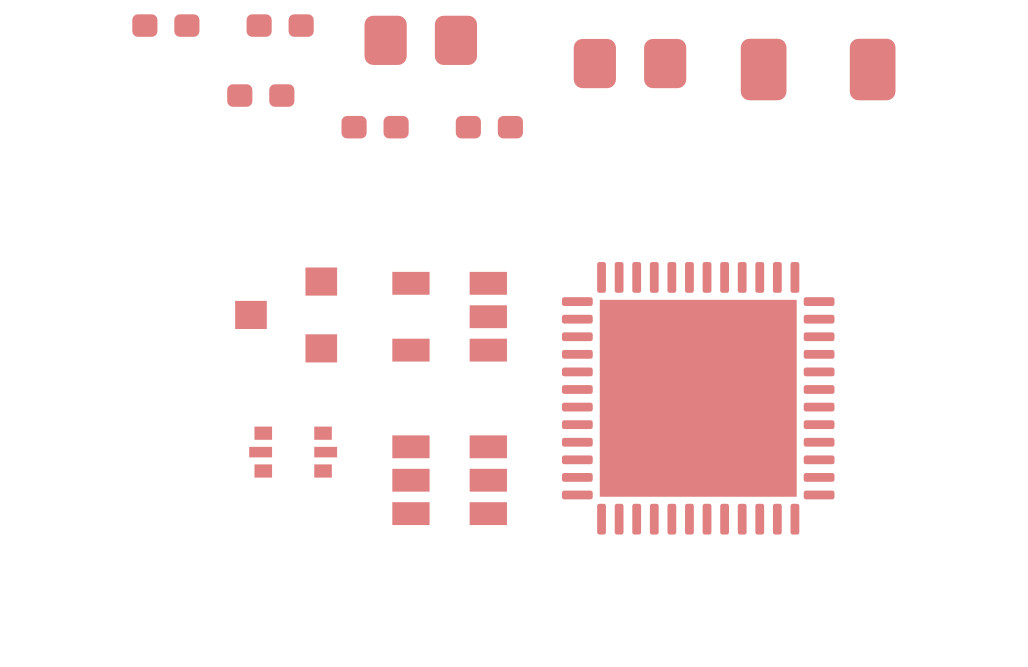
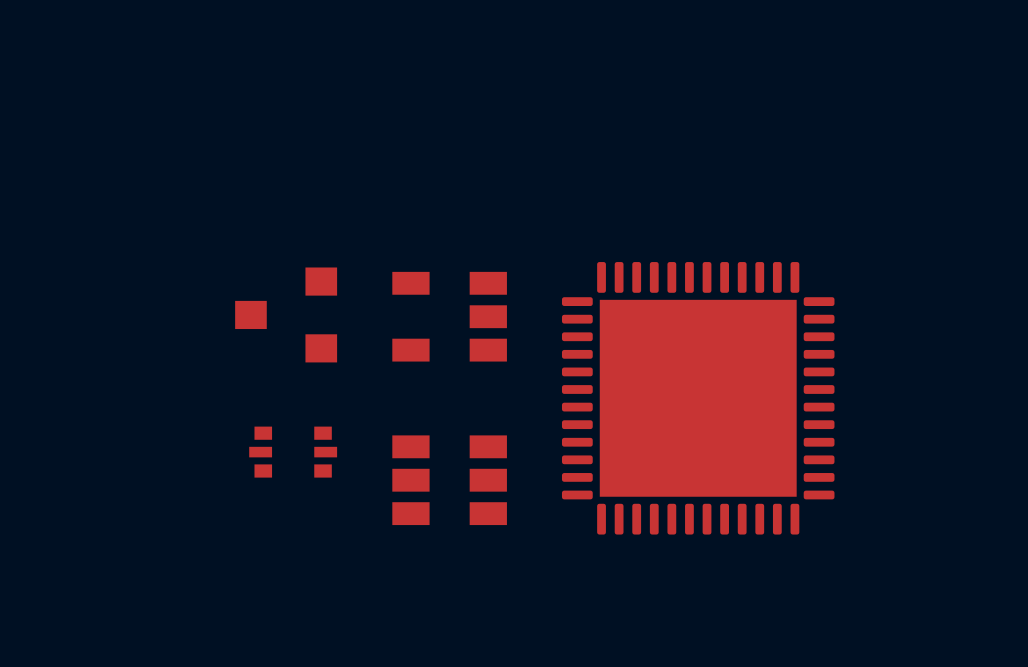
part: (165, 25) -> none
part: (280, 25) -> none
part: (420, 40) -> none
part: (630, 63) -> none
part: (818, 69) -> none
part: (260, 95) -> none
part: (375, 127) -> none
part: (489, 127) -> none

